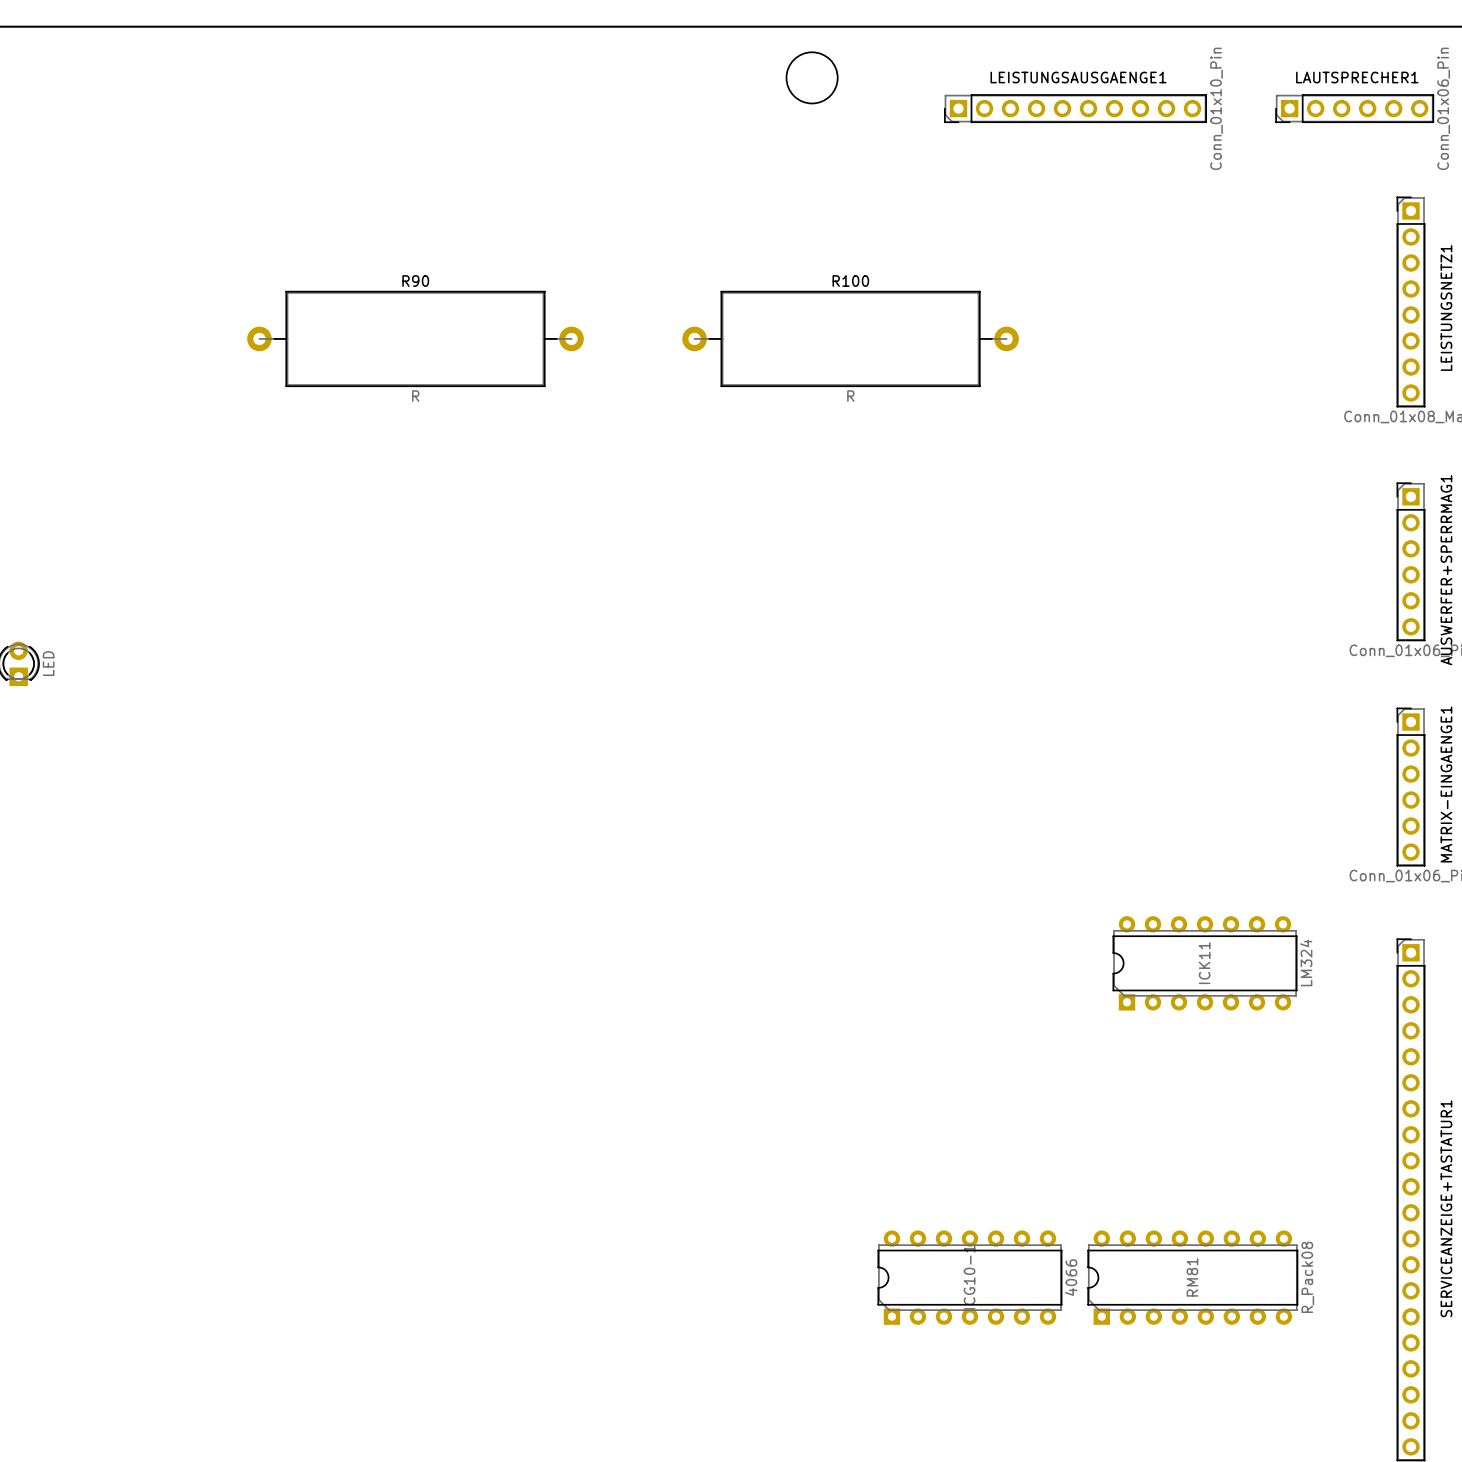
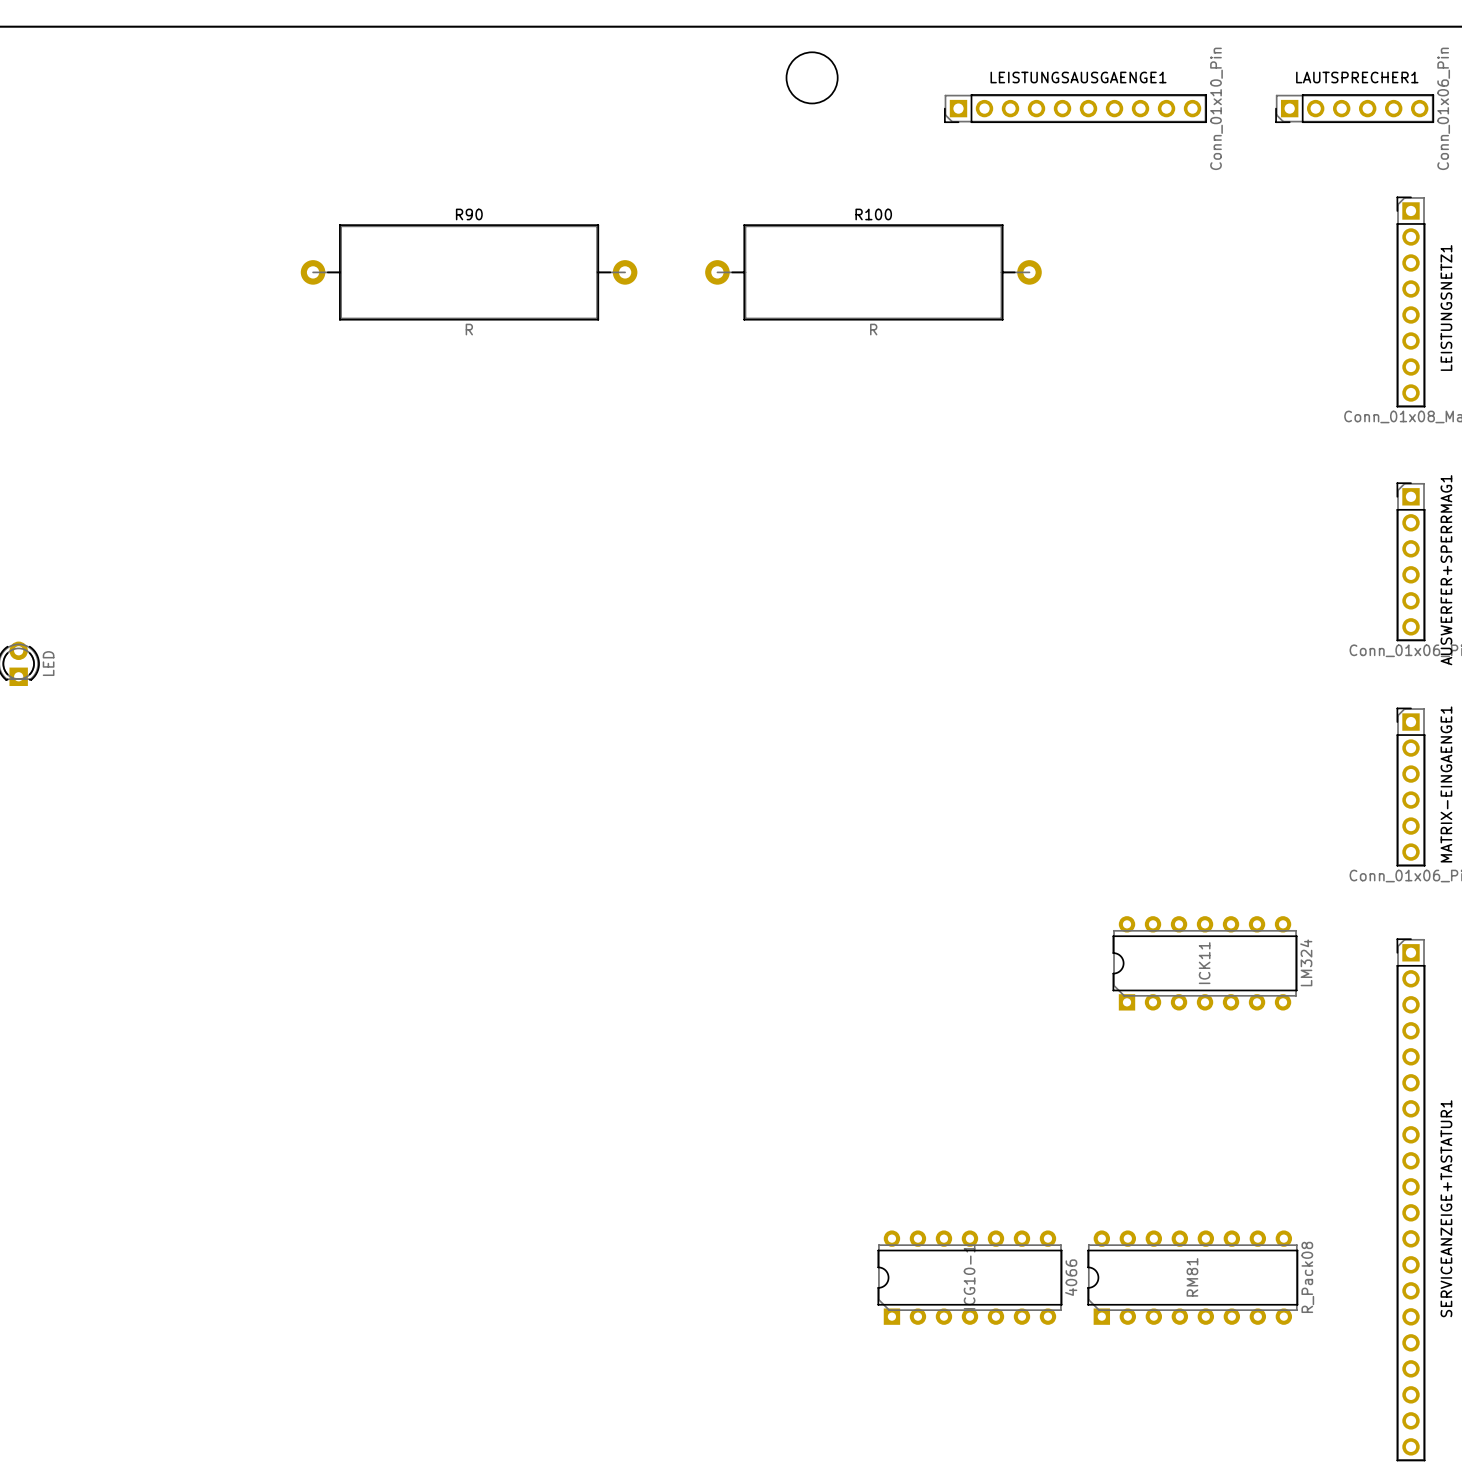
R90 position: (415, 338) -> (469, 272)
R100 position: (850, 338) -> (873, 272)

